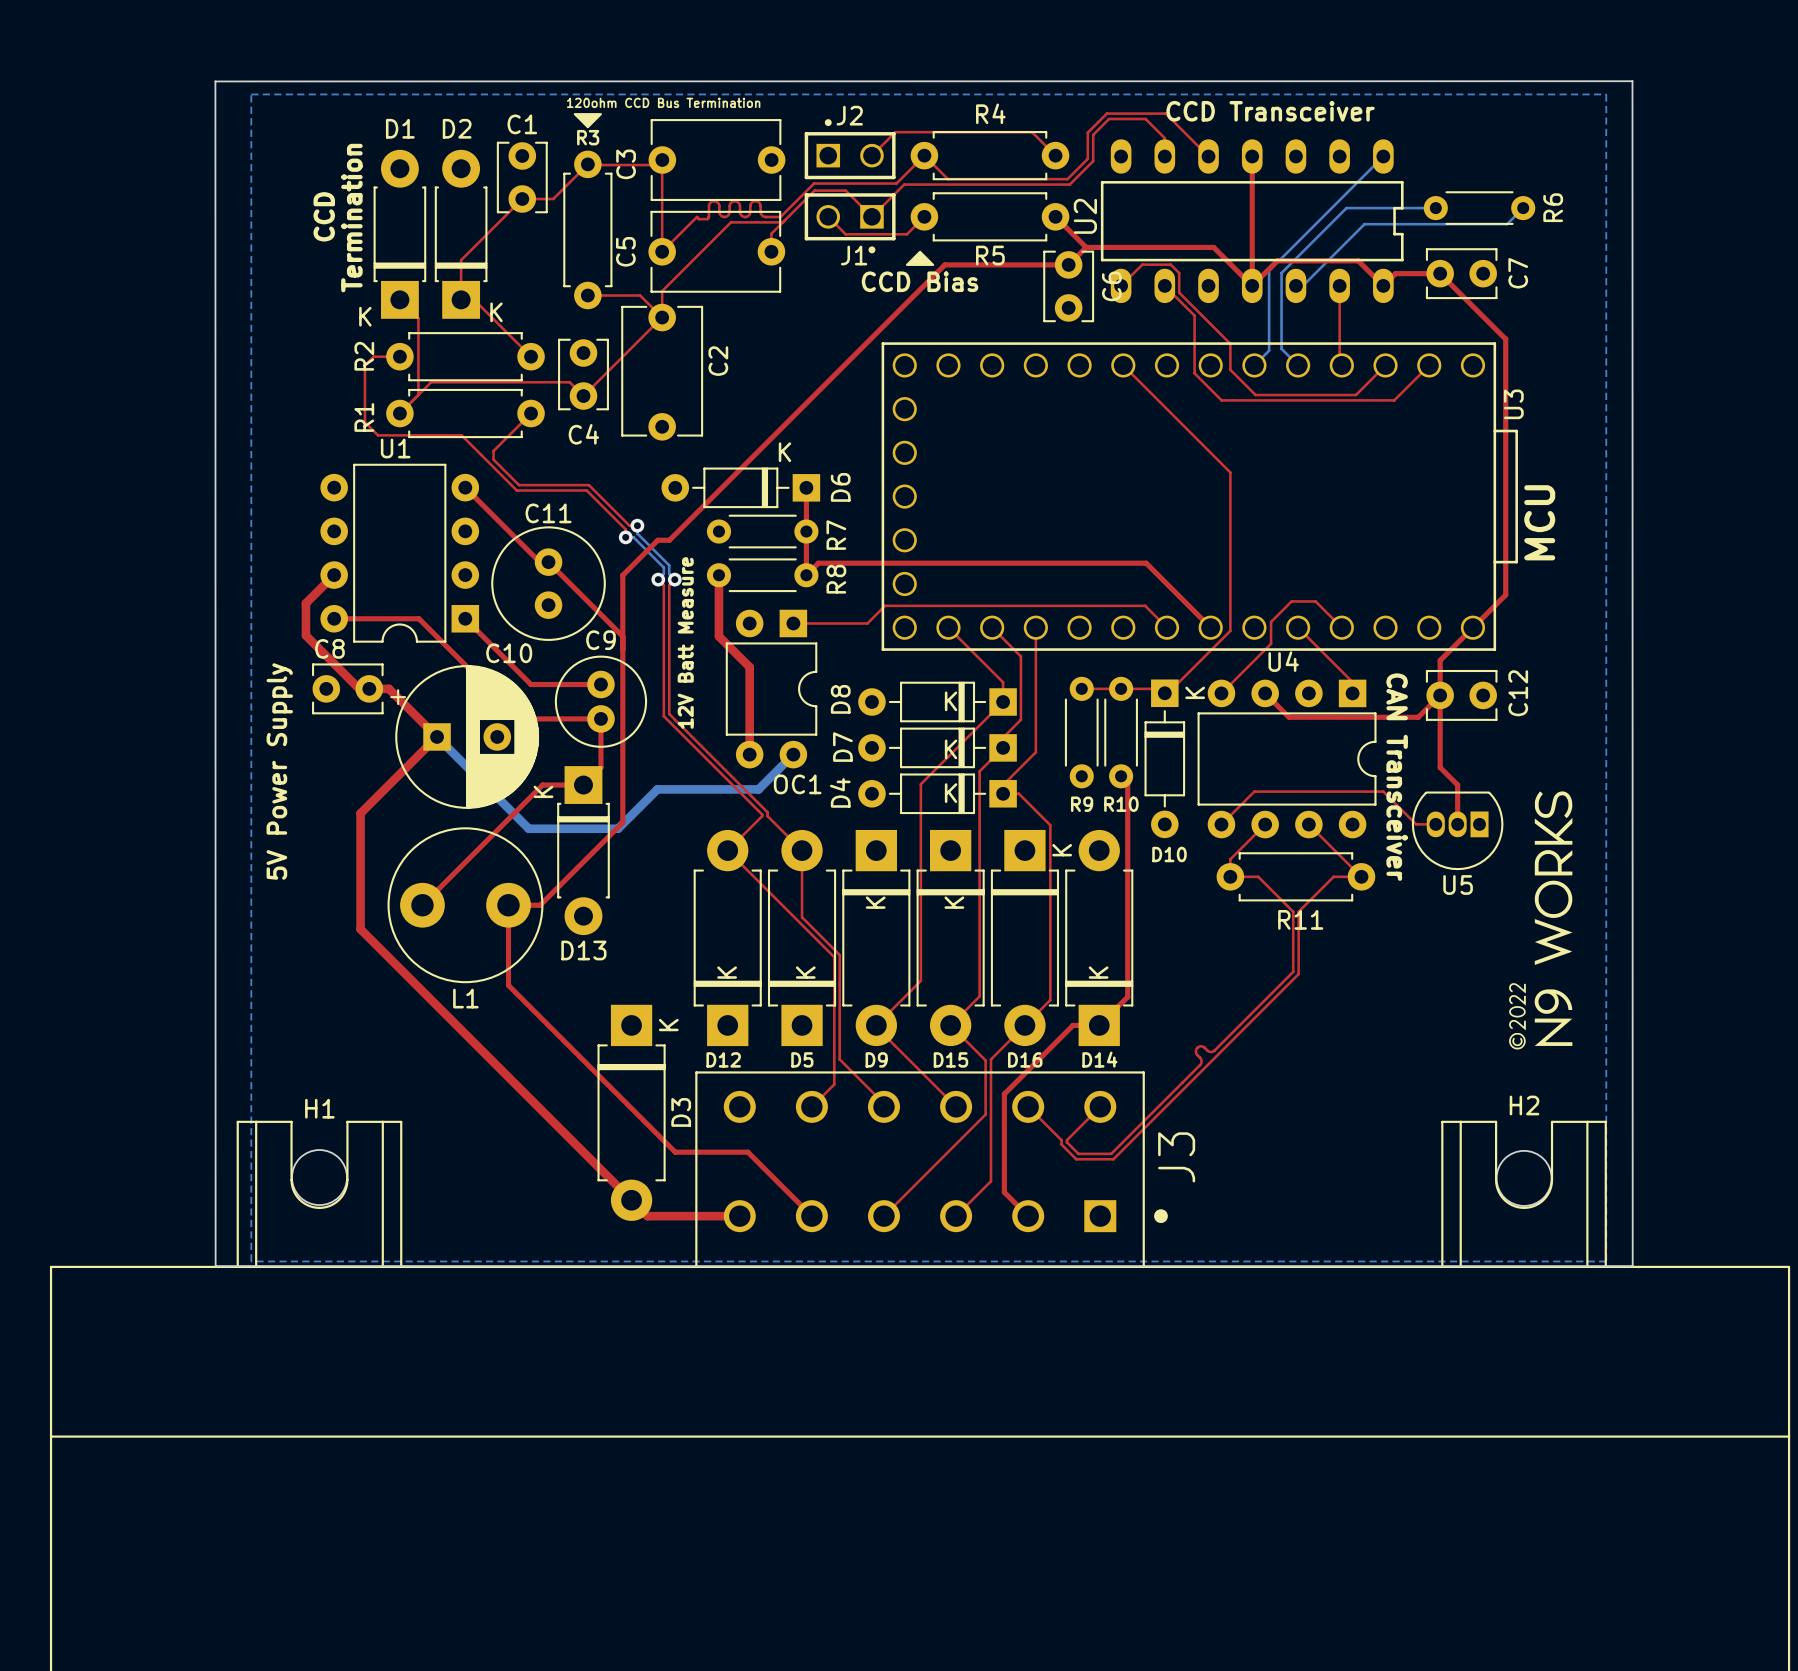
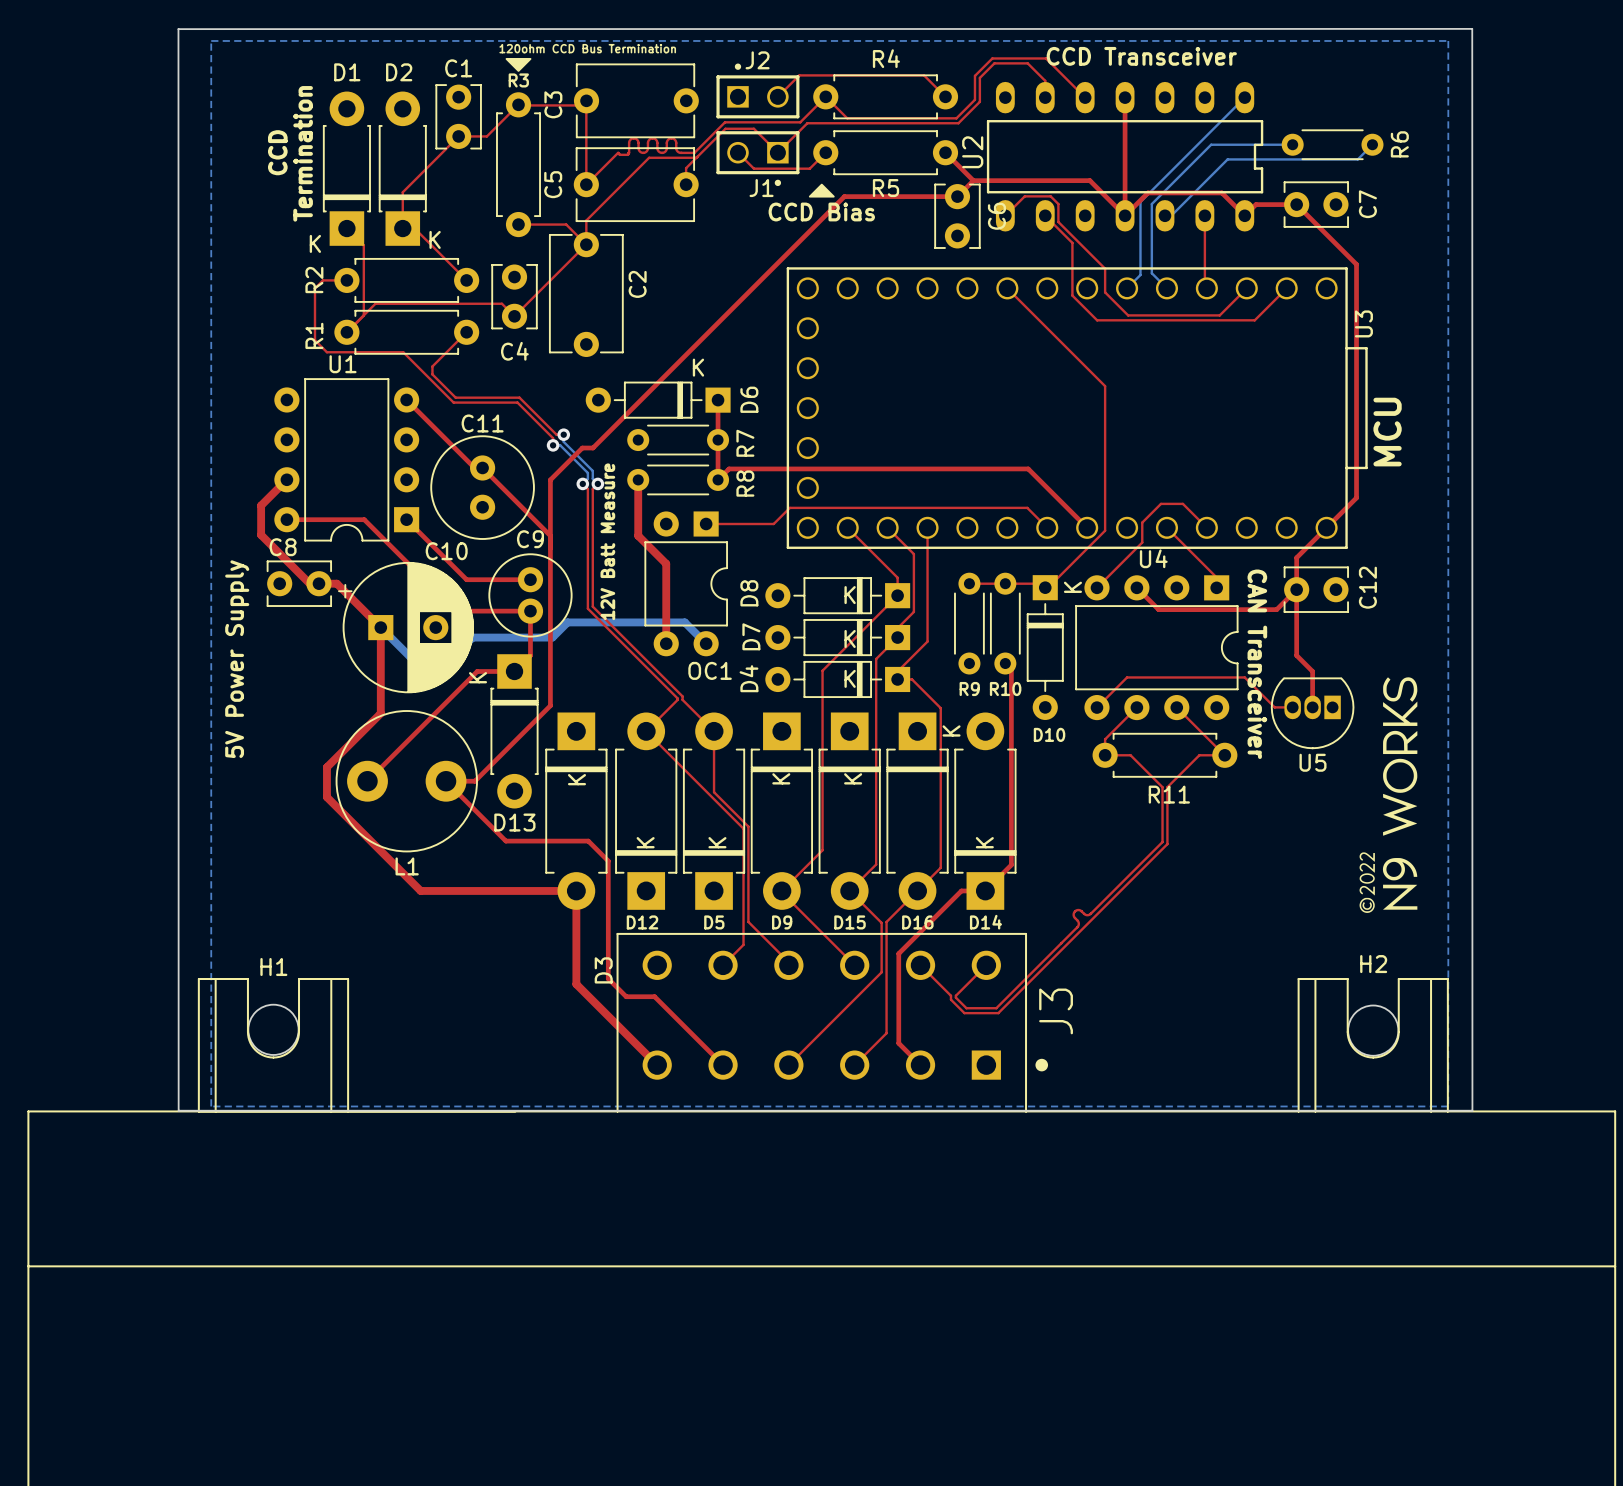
top track: (437, 736) (360, 813) (360, 929) (647, 1216) (739, 1216) -> (380, 627) (380, 713) (326, 767) (326, 797) (420, 890) (576, 890) (576, 984) (657, 1065)
bottom track: (793, 754) (758, 789) (657, 789) (618, 828) (528, 828) (469, 769) -> (706, 643) (684, 622) (567, 622) (552, 637) (472, 637) (452, 657) (410, 657)
top track: (508, 905) (508, 985) (675, 1152) (747, 1152) -> (446, 781) (505, 841) (588, 841) (608, 861) (608, 978) (626, 996) (654, 996) (664, 1006)
D3 text position: K (668, 1025) -> K (576, 779)
D3 position: (631, 1112) -> (576, 811)

